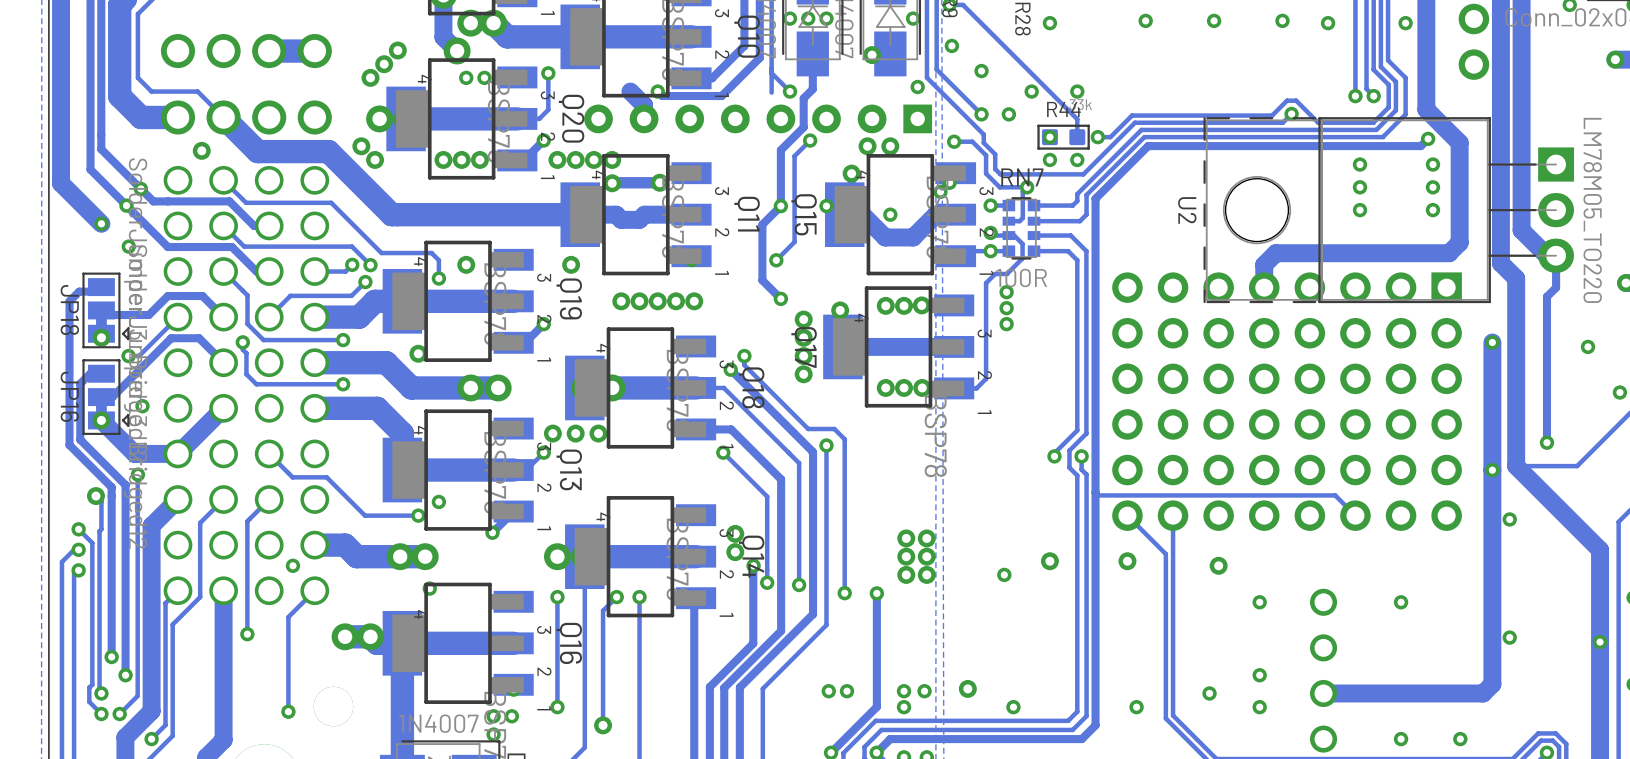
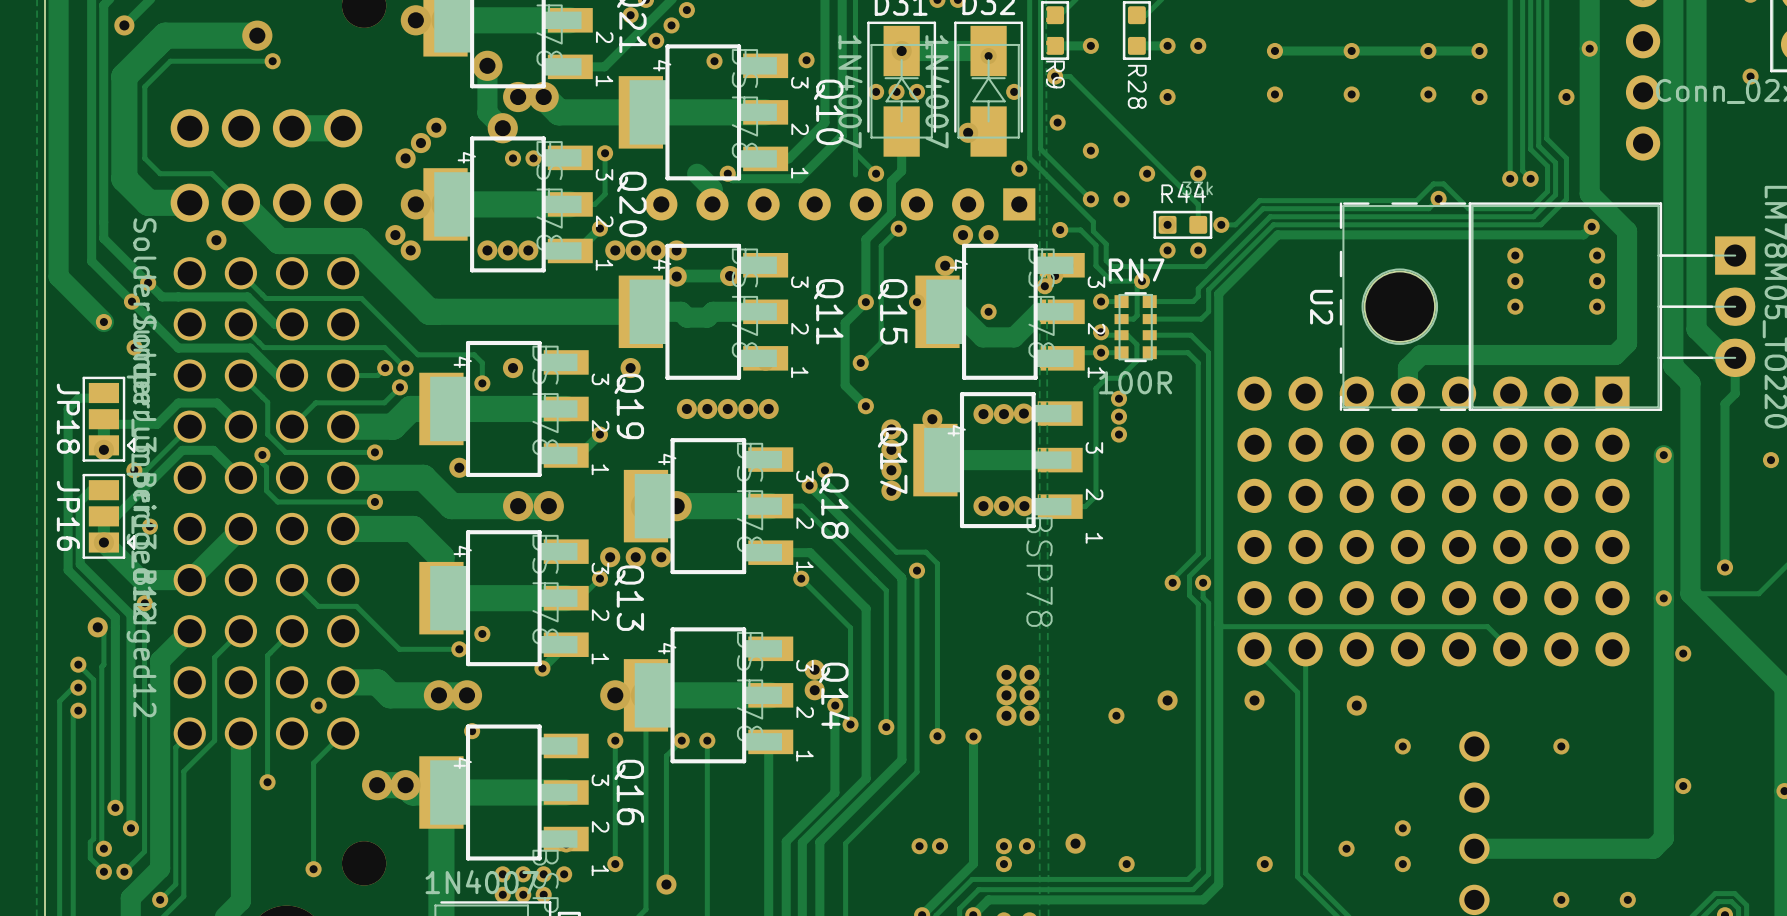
via: none -> (502, 874)
via: none -> (523, 874)
via: none -> (502, 894)
via: none -> (523, 894)

